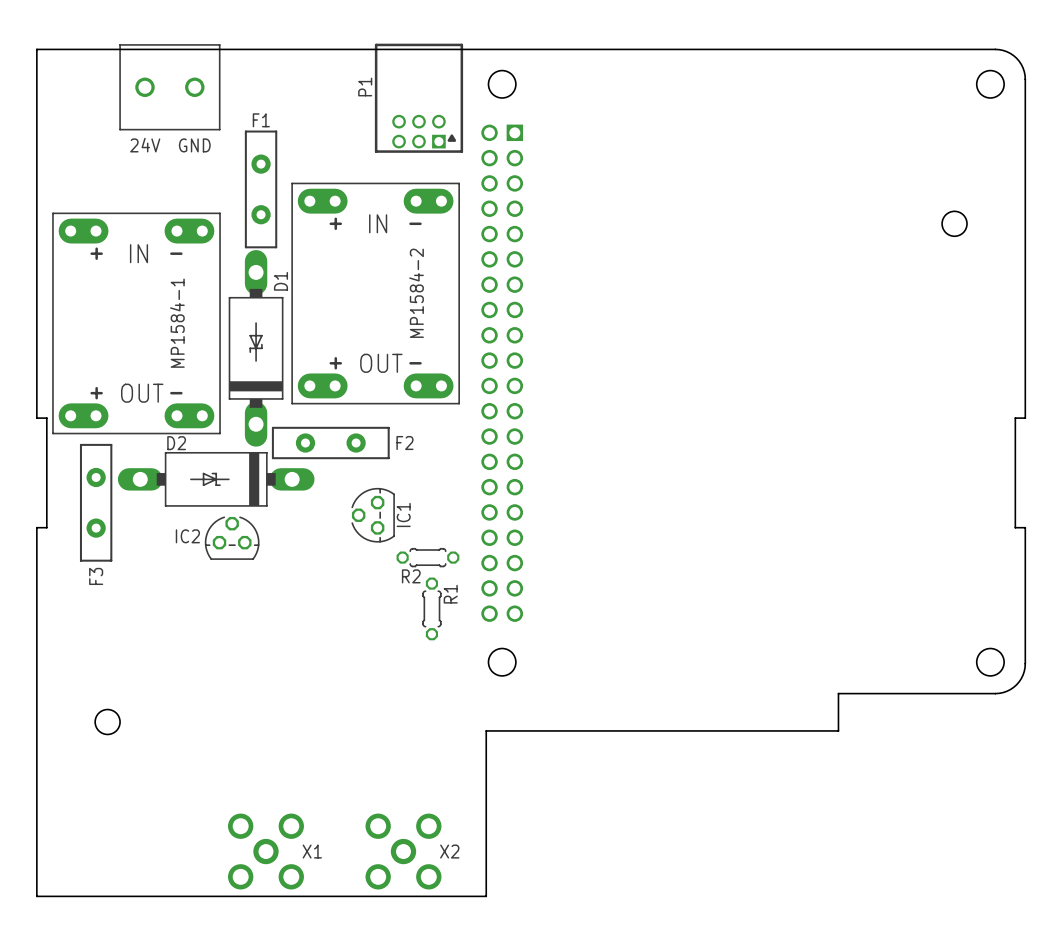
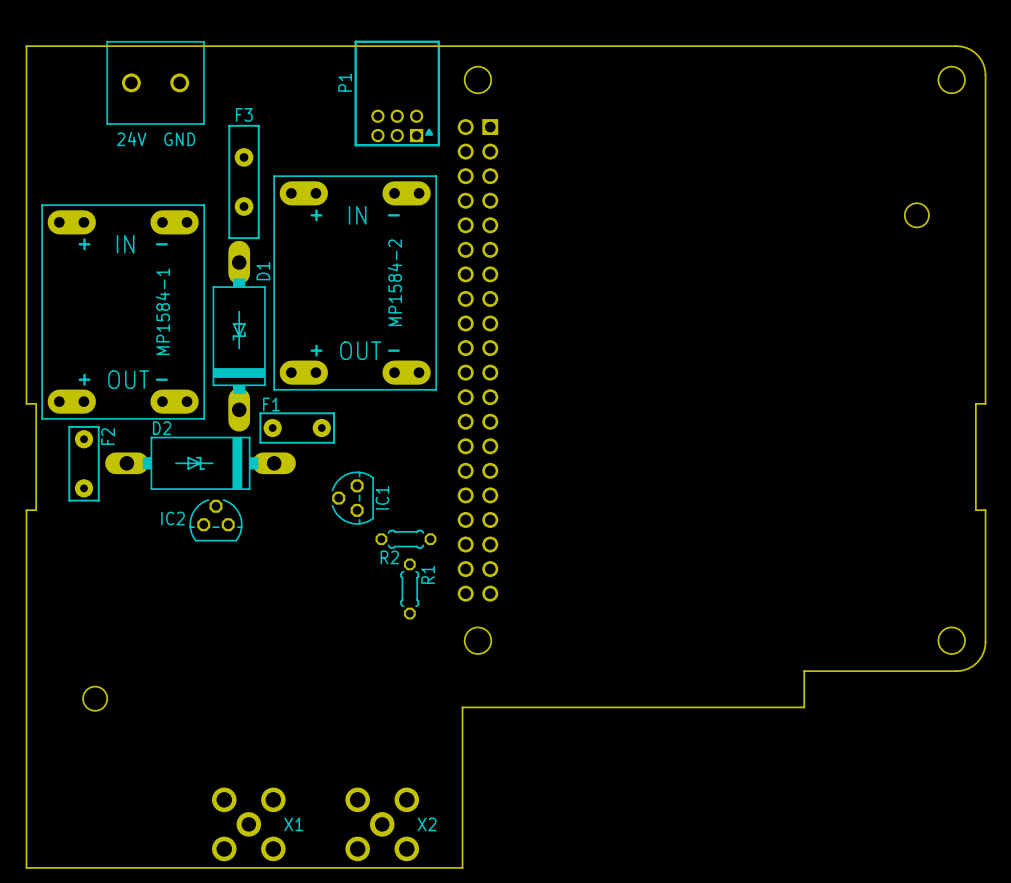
F1 name: F1 (261, 120) -> F3 (244, 114)
F2 footprint: [271, 426, 390, 460] -> [68, 425, 100, 502]
F1: none -> (297, 428)
F2 name position: F2 (404, 443) -> F2 (108, 436)
F3: (96, 502) -> none

